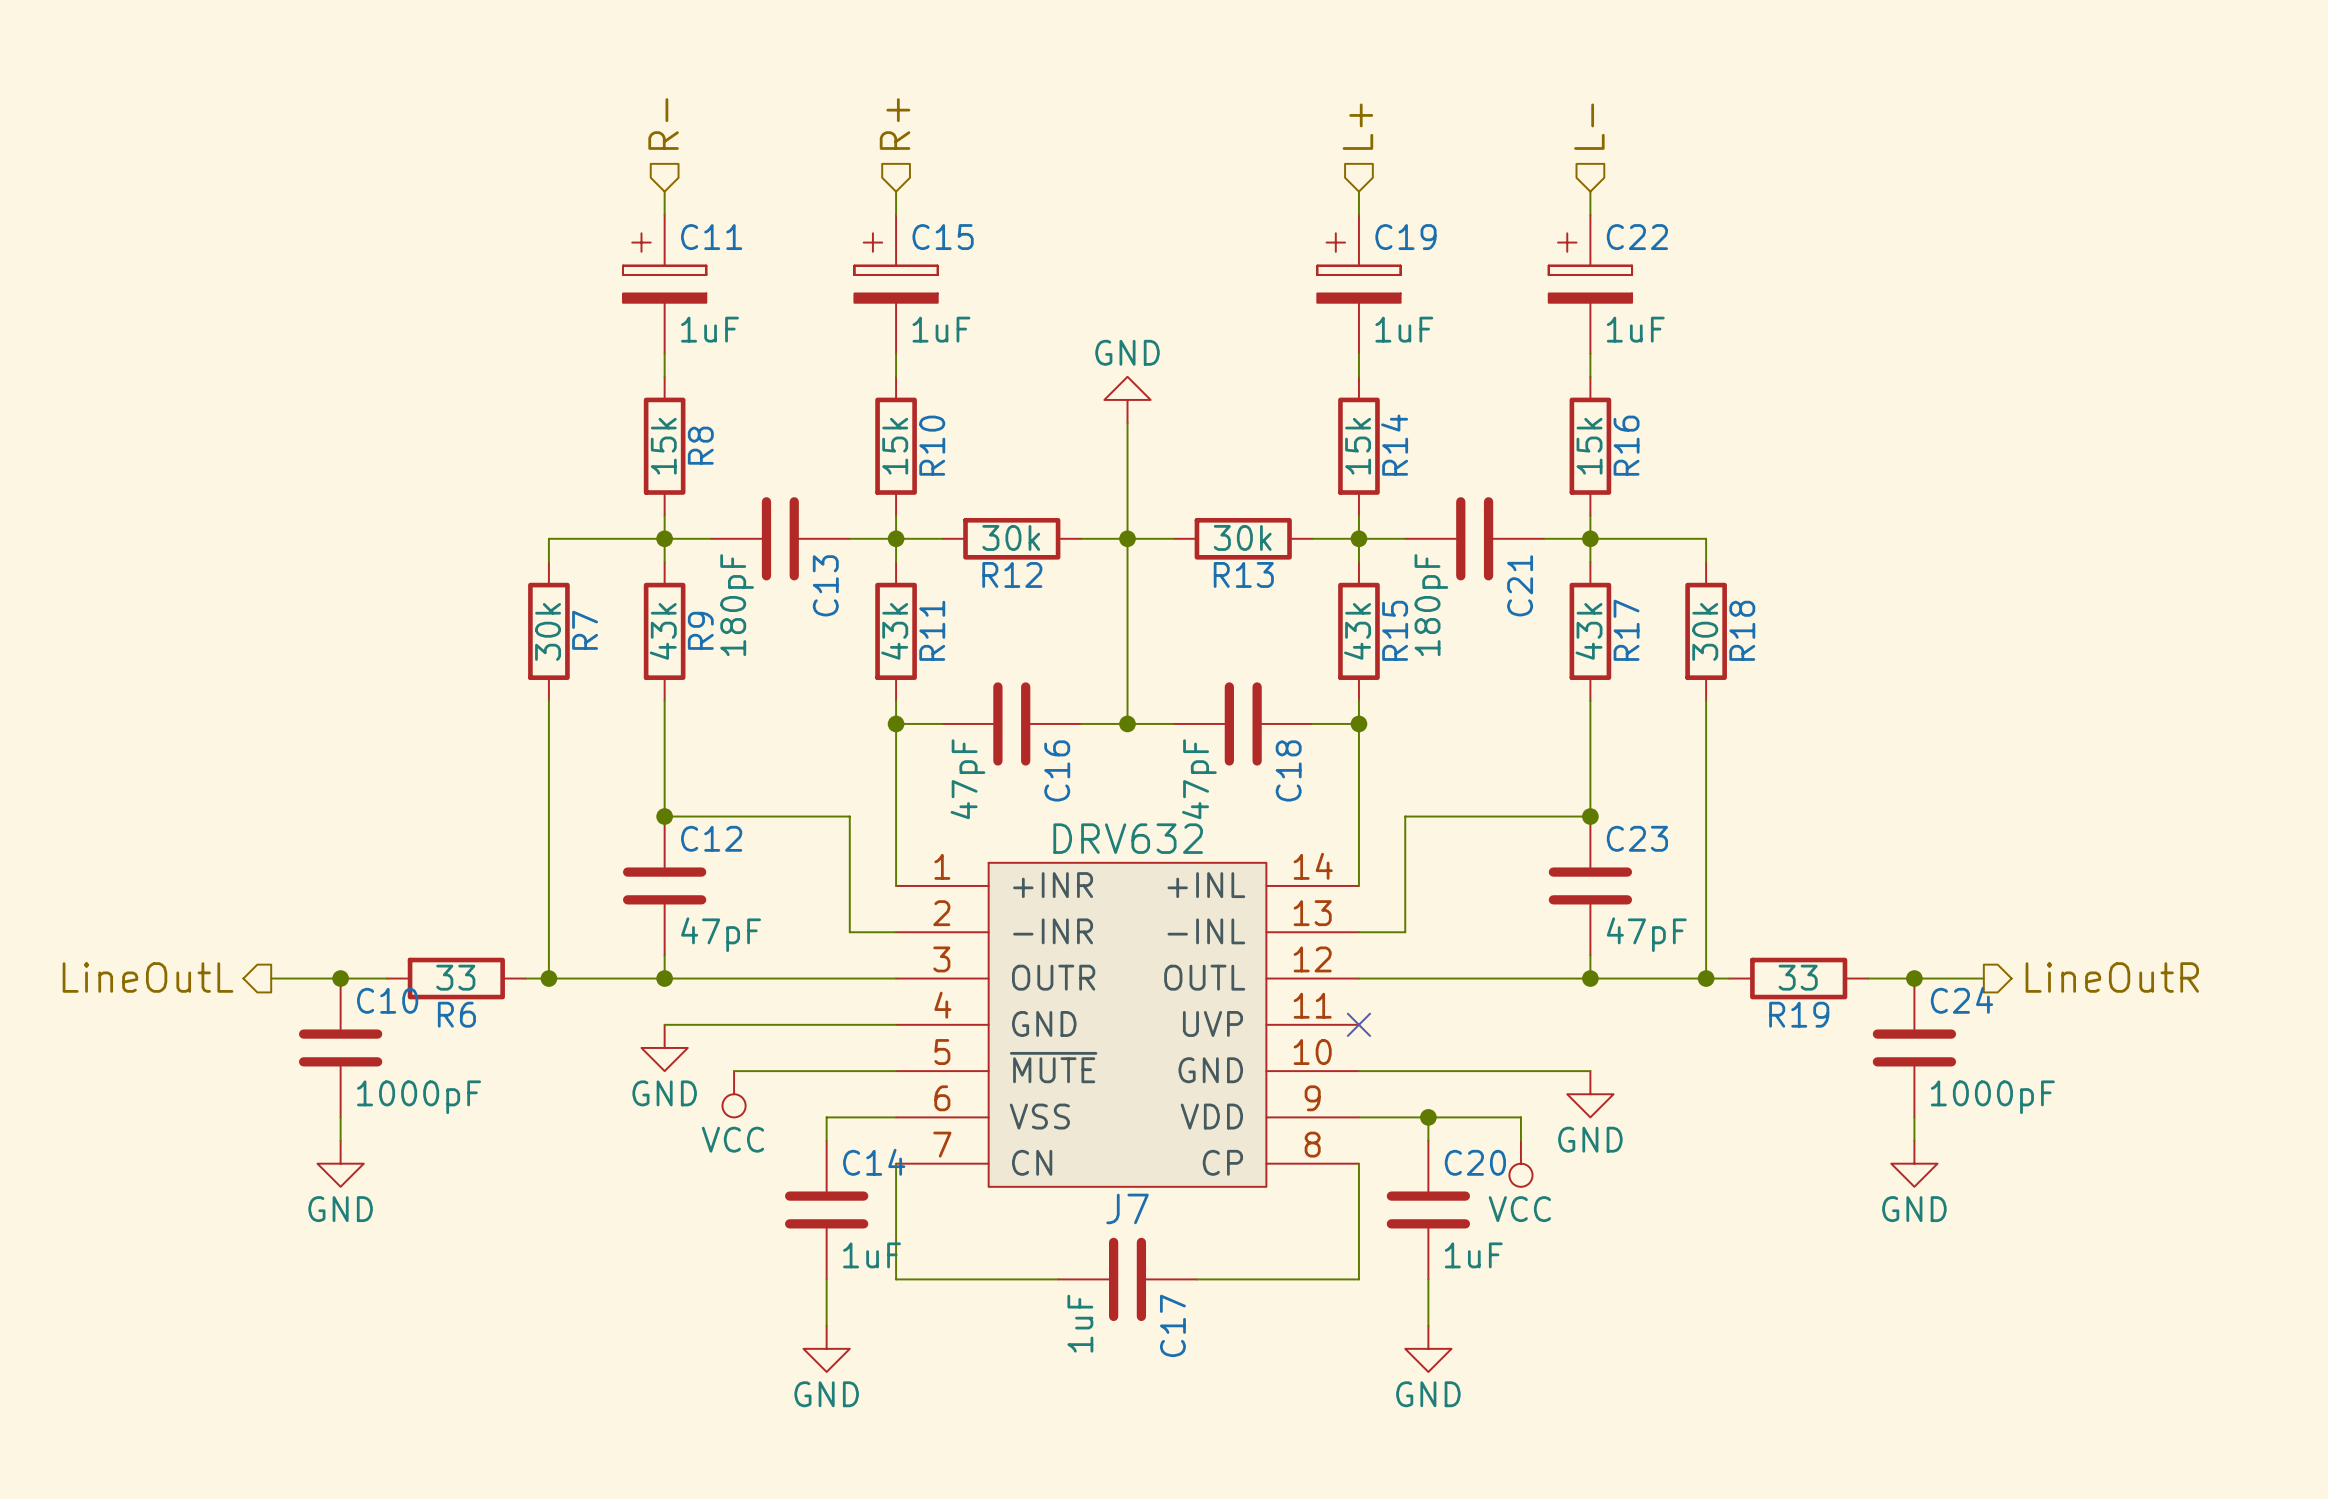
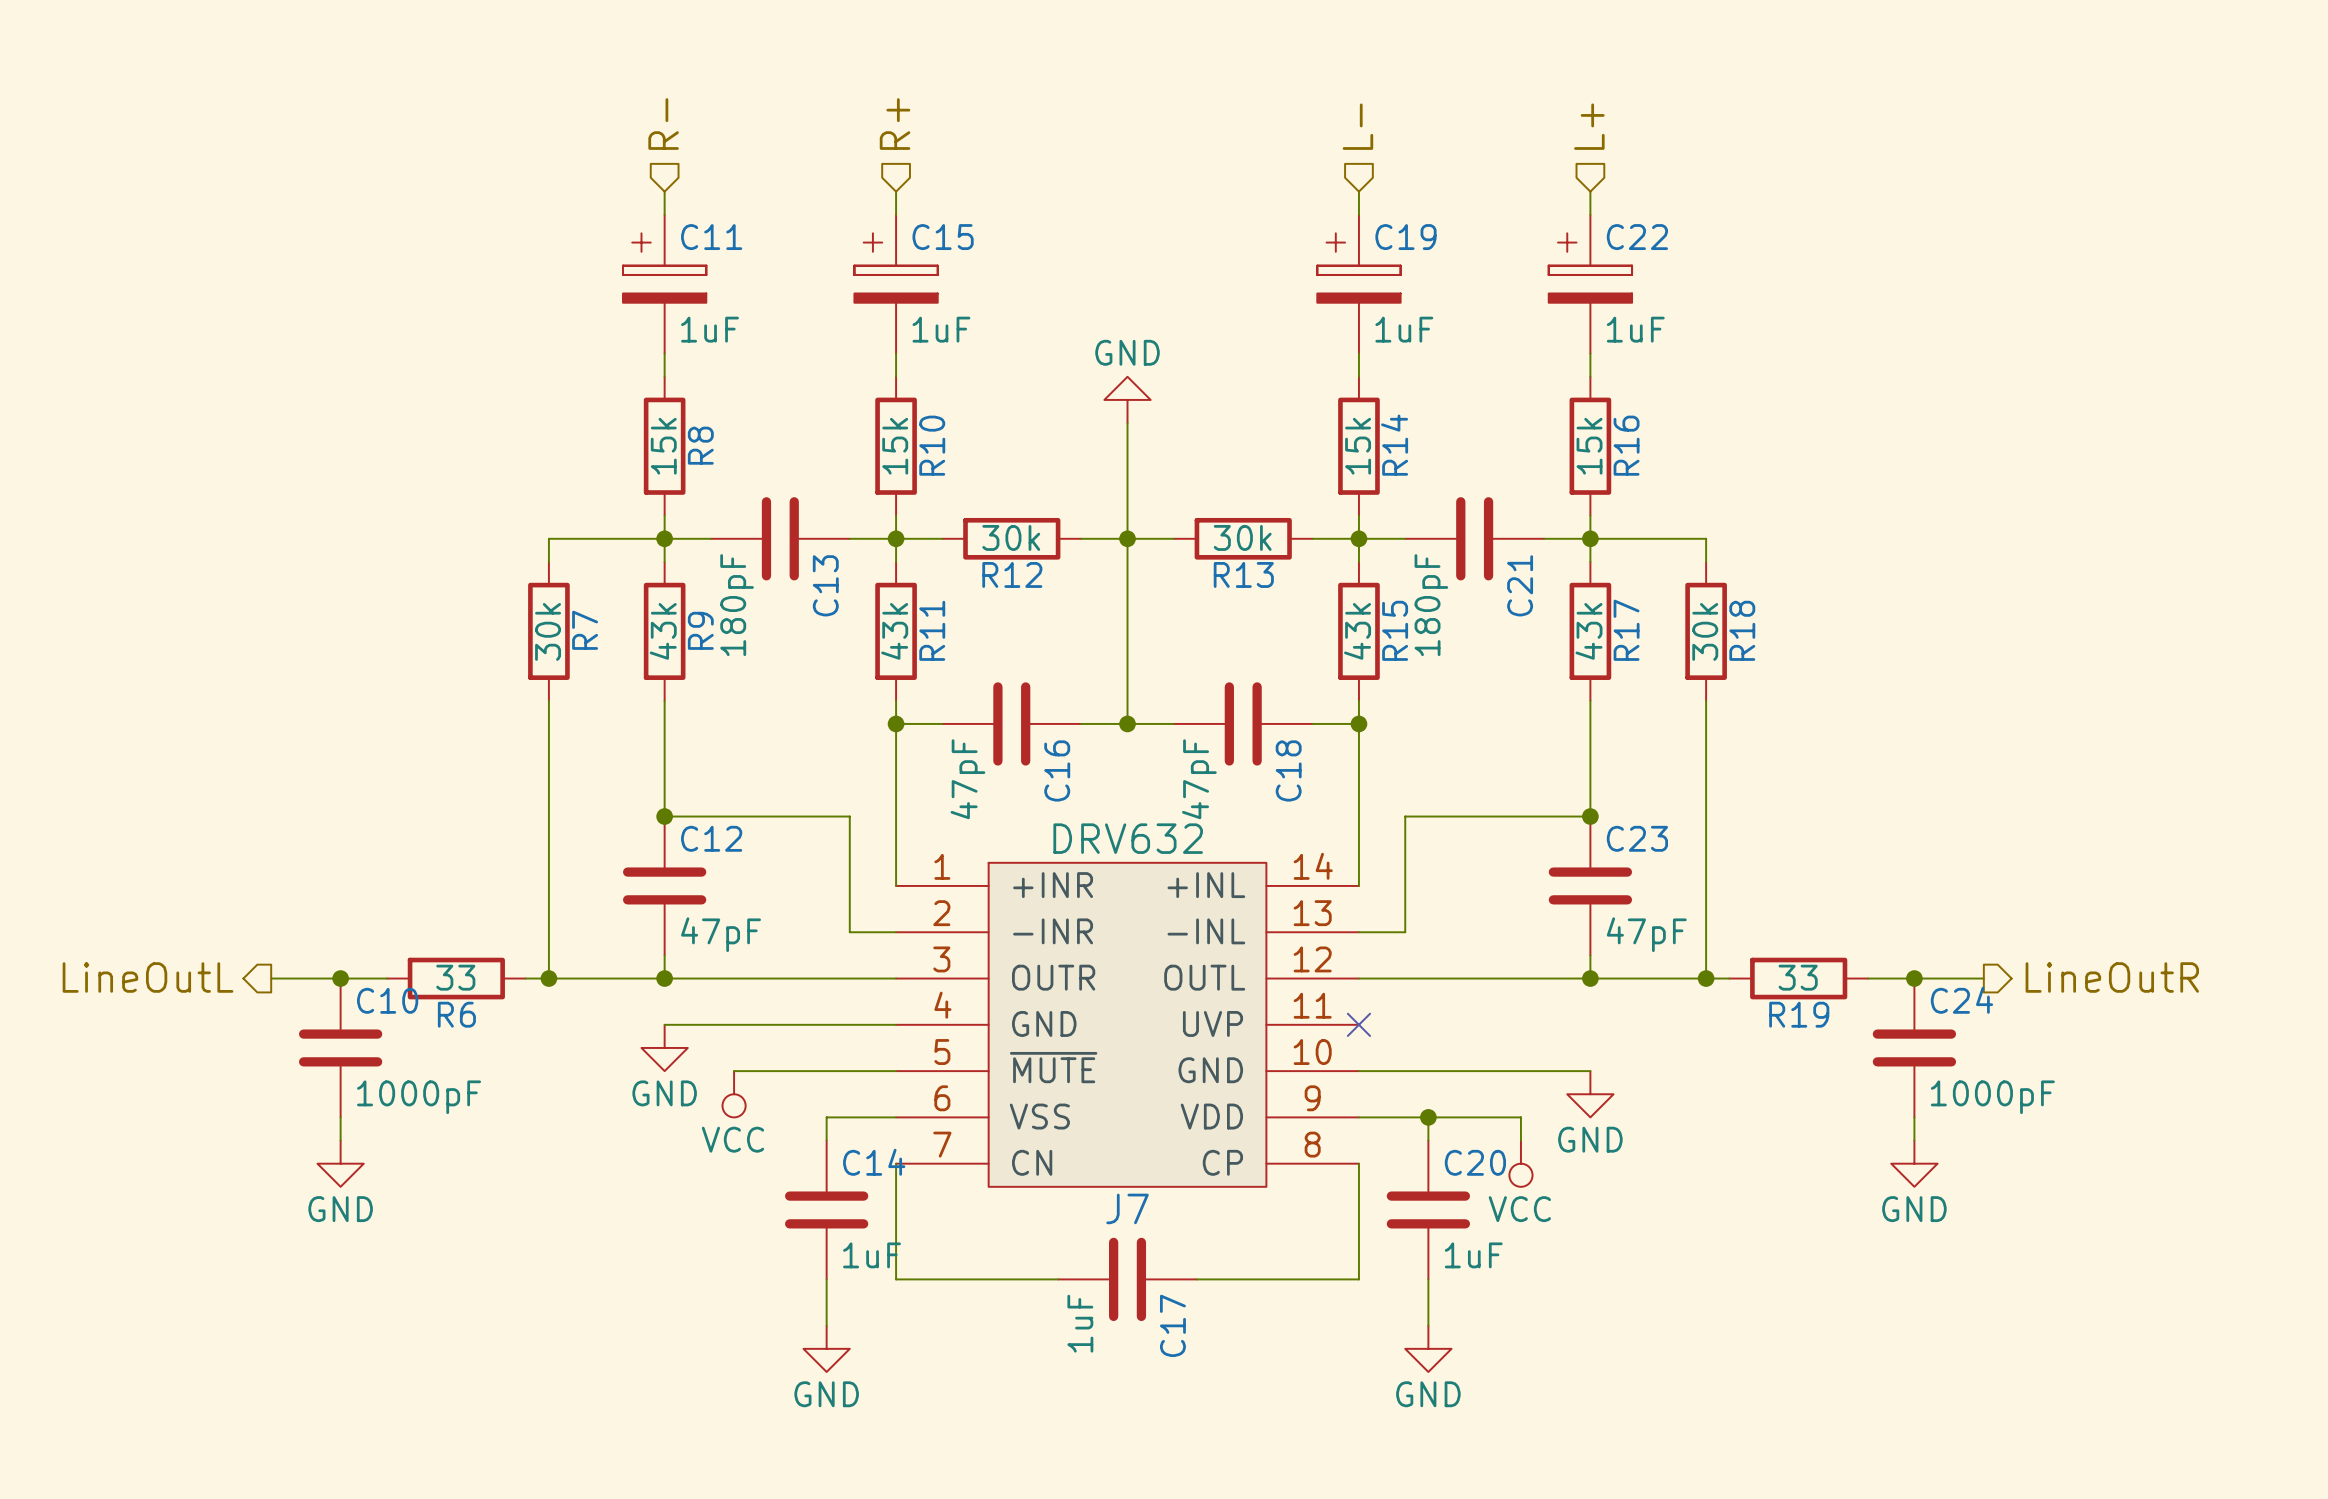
hierarchical label: L+ (1357, 126) -> L- (1357, 126)
hierarchical label: L- (1589, 126) -> L+ (1589, 126)

